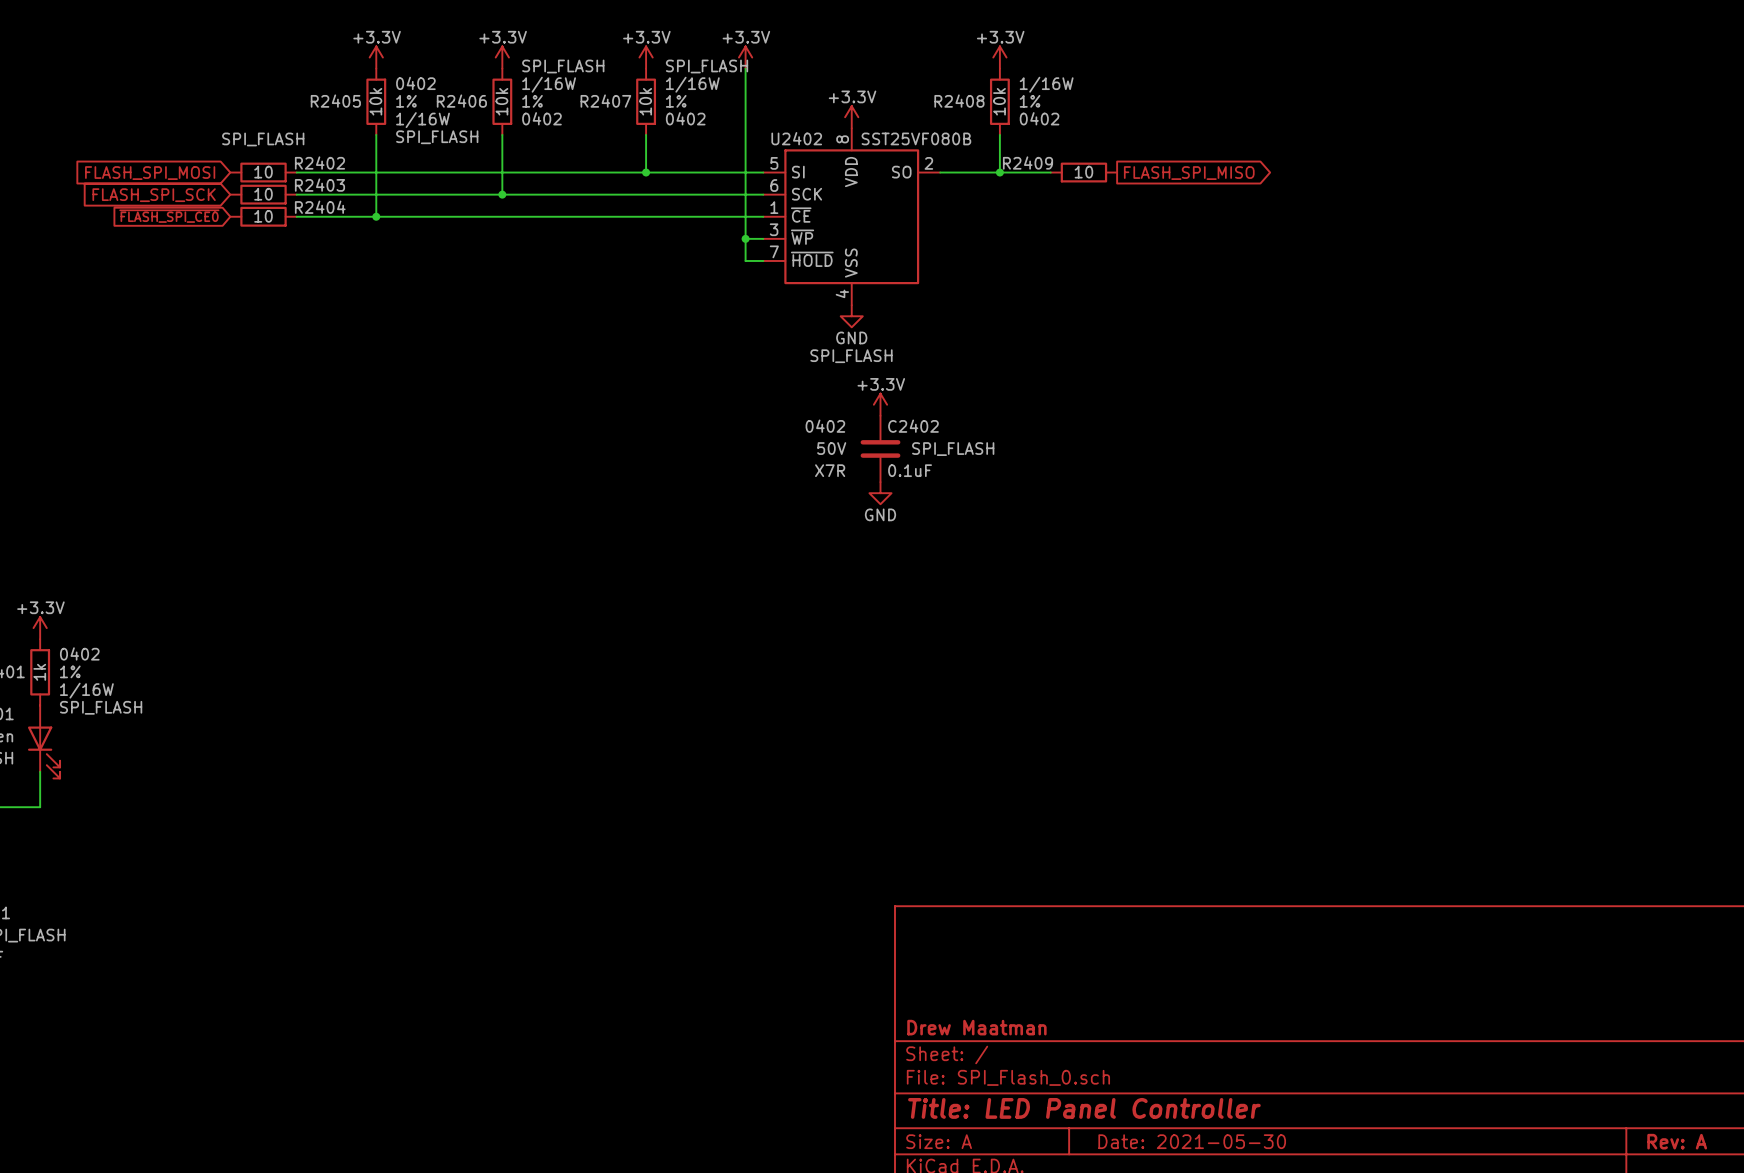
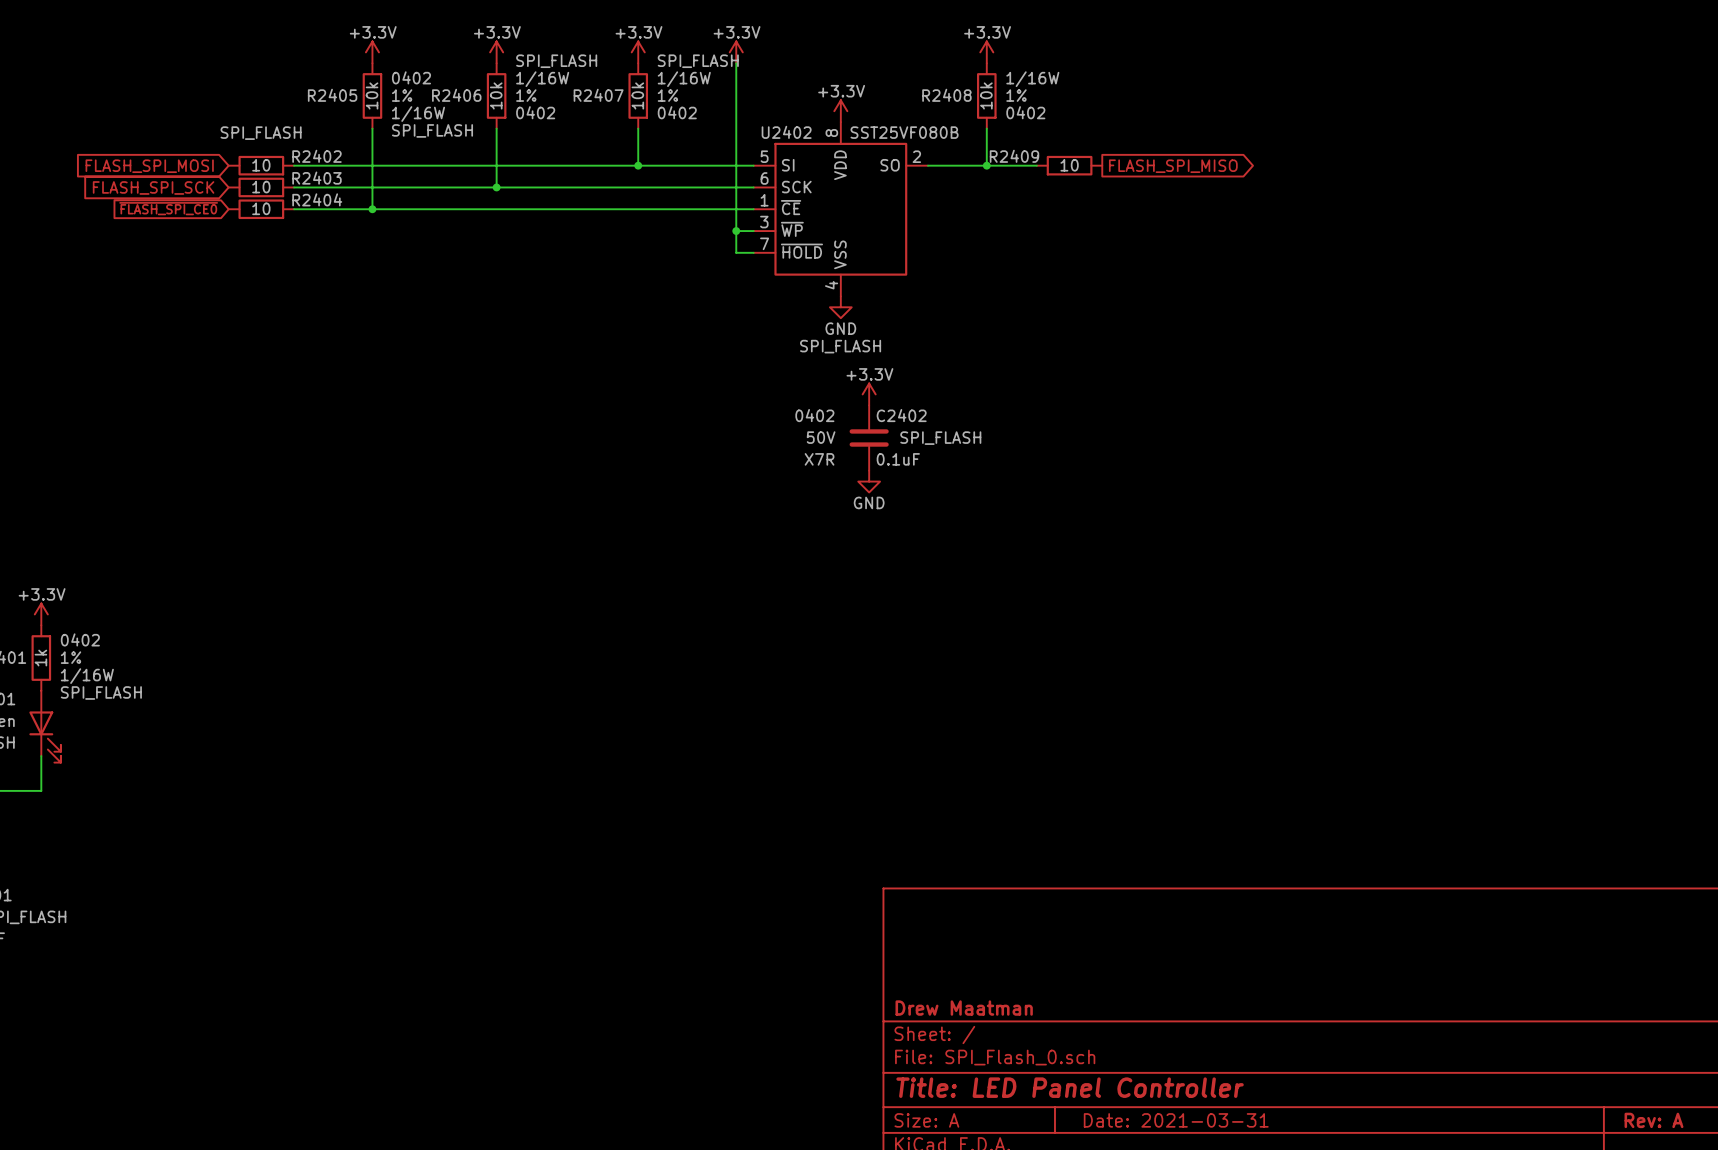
title block: Date: 2021-05-30 (1192, 1141) -> Date: 2021-03-31 (1176, 1120)

